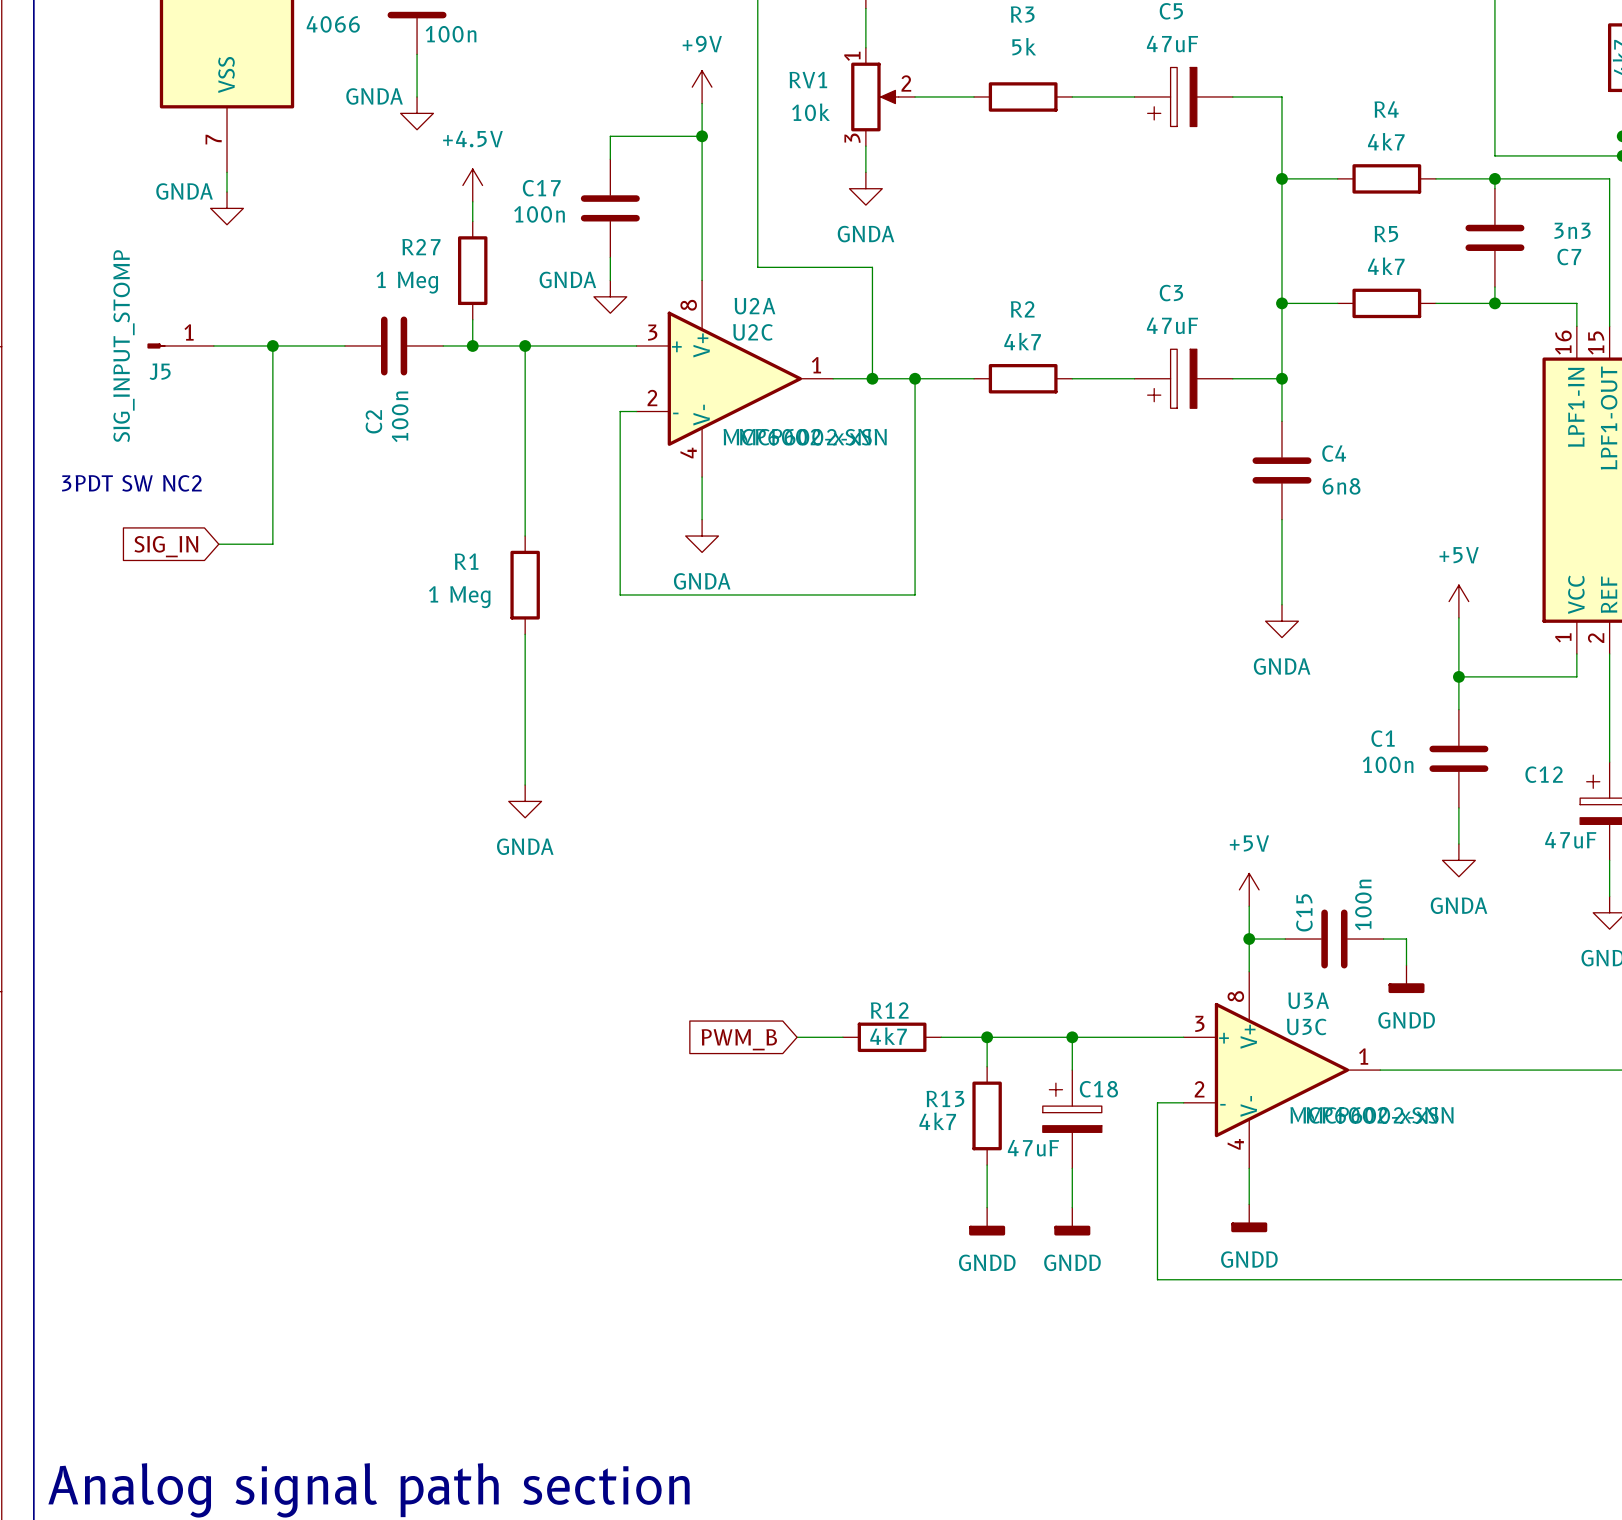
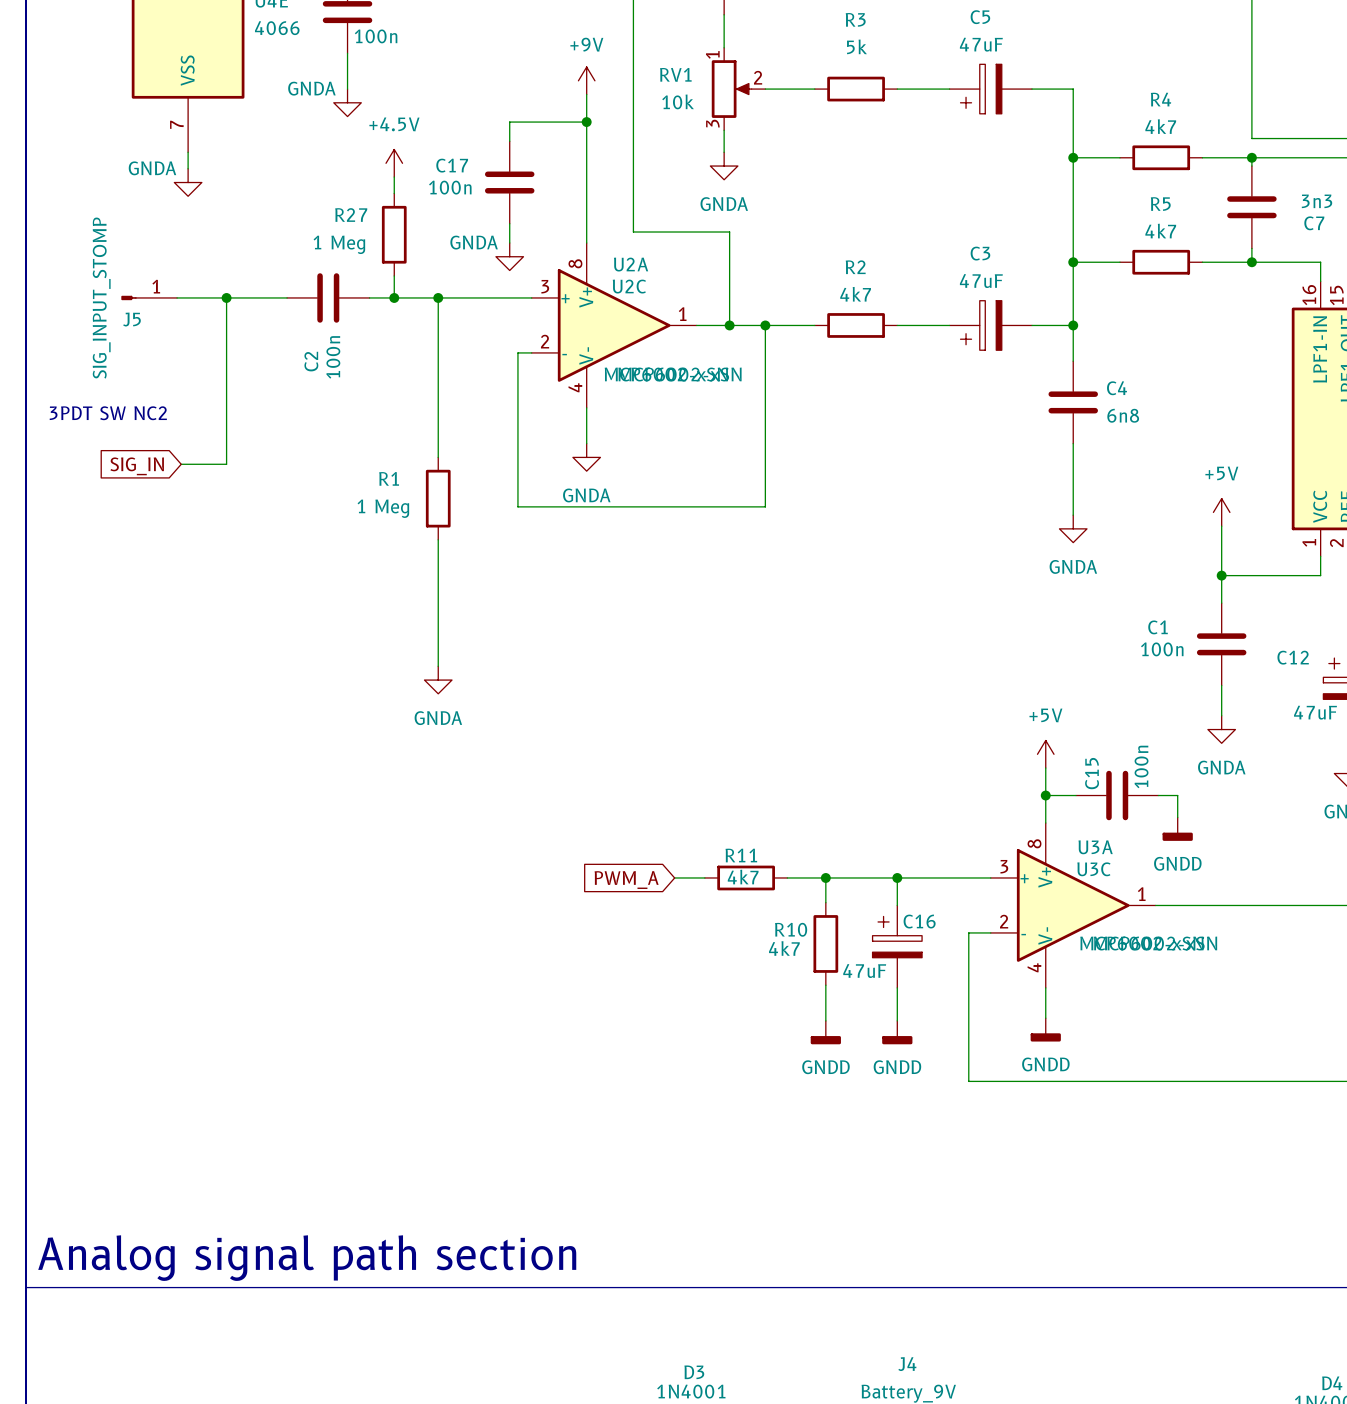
R12 name: R12 (889, 1010) -> R11 (741, 855)
wire: (797, 1037) (806, 1037) -> none
global label: PWM_B (739, 1039) -> PWM_A (626, 880)
C18 name: C18 (1098, 1089) -> C16 (919, 921)
R13 name: R13 (945, 1098) -> R10 (791, 929)

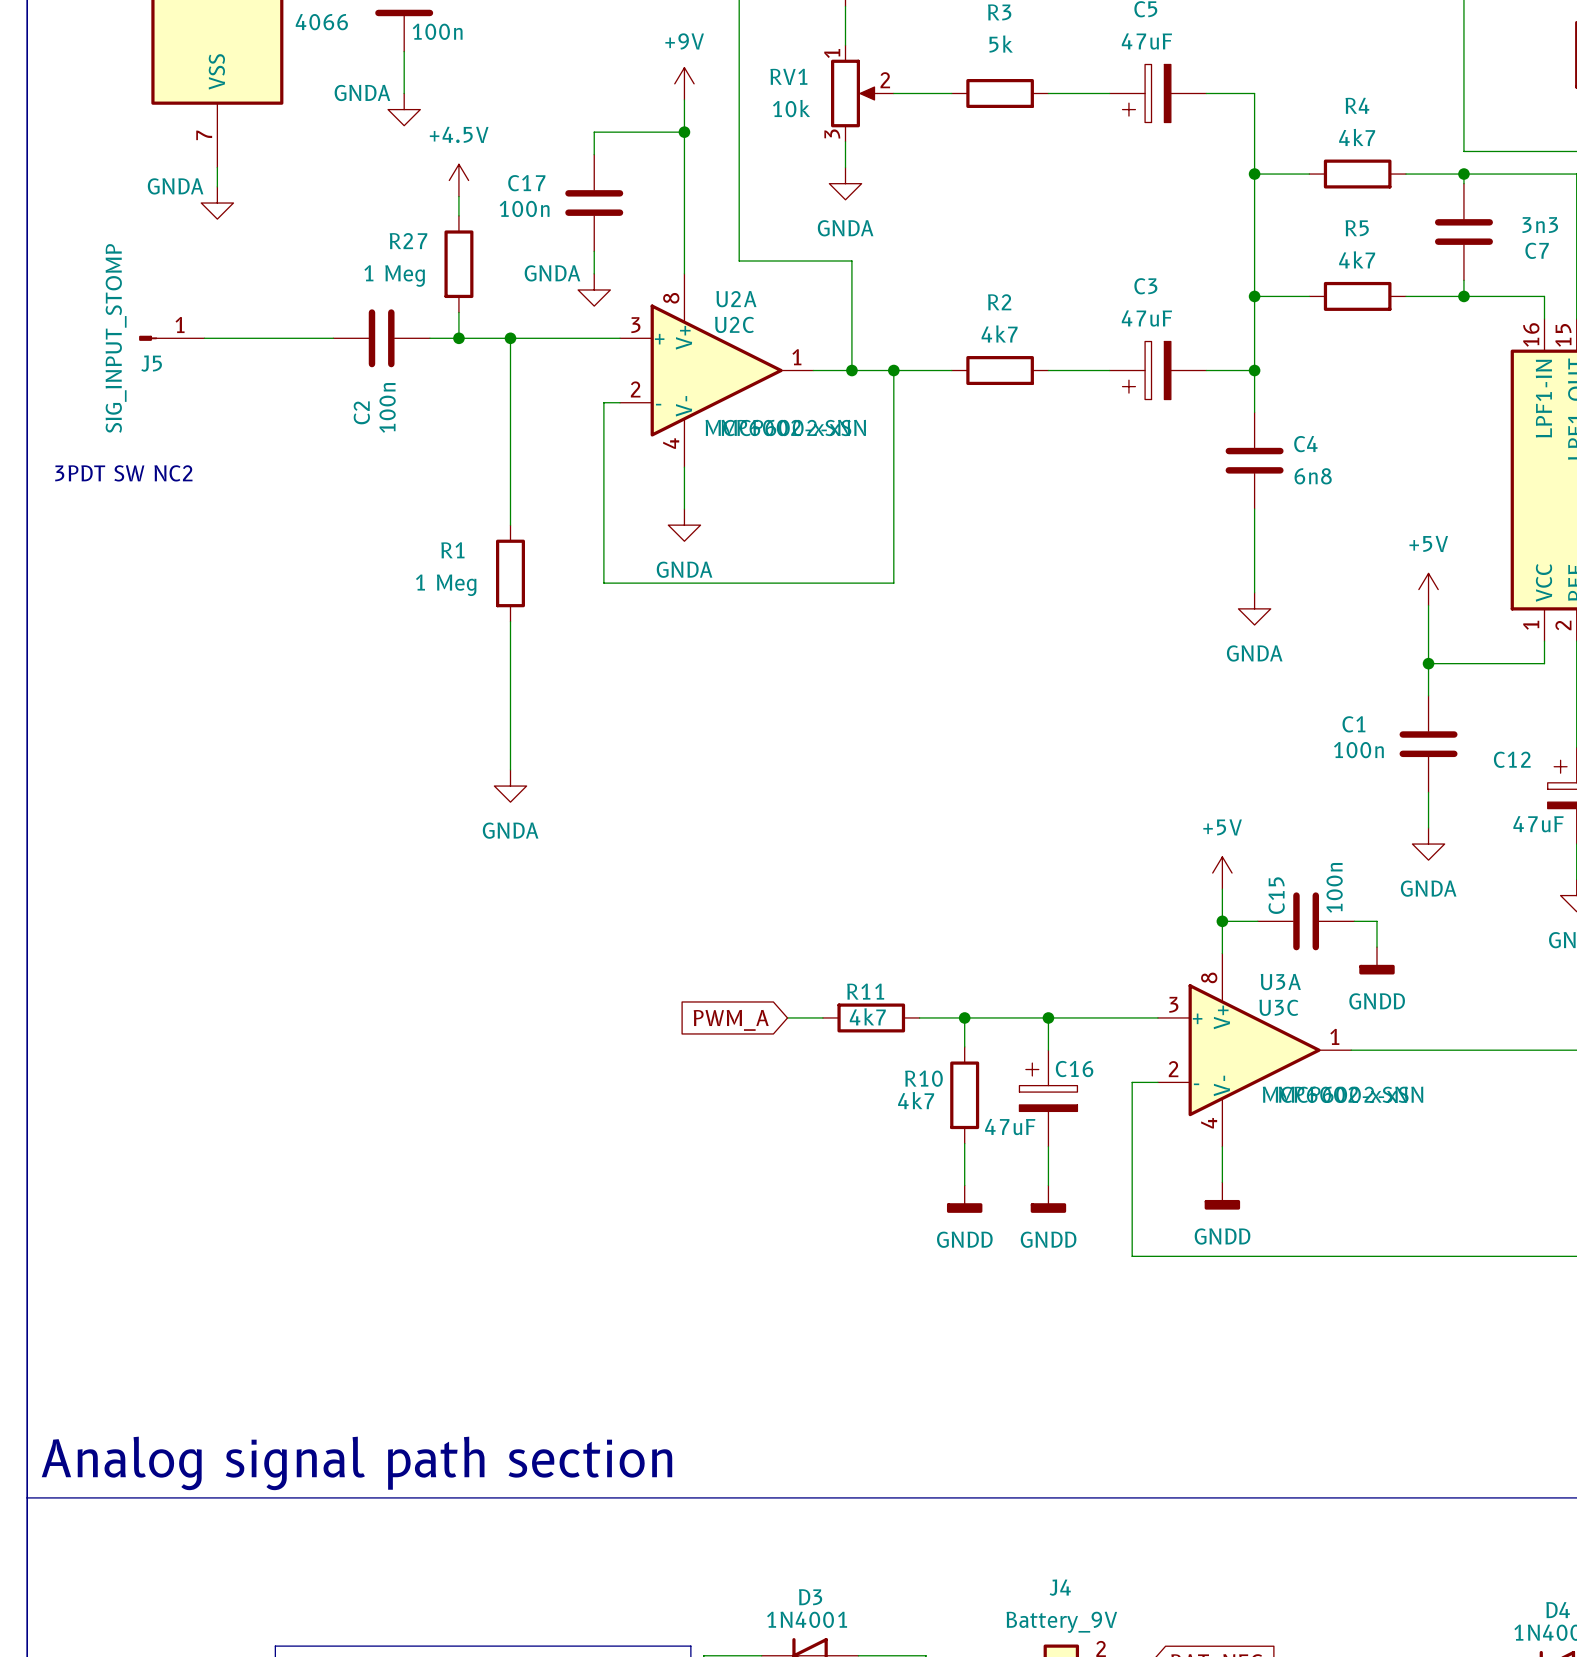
wire: (226, 297) (226, 464) (181, 464) -> none
junction: (226, 297) -> none
global label: SIG_IN (137, 466) -> none

